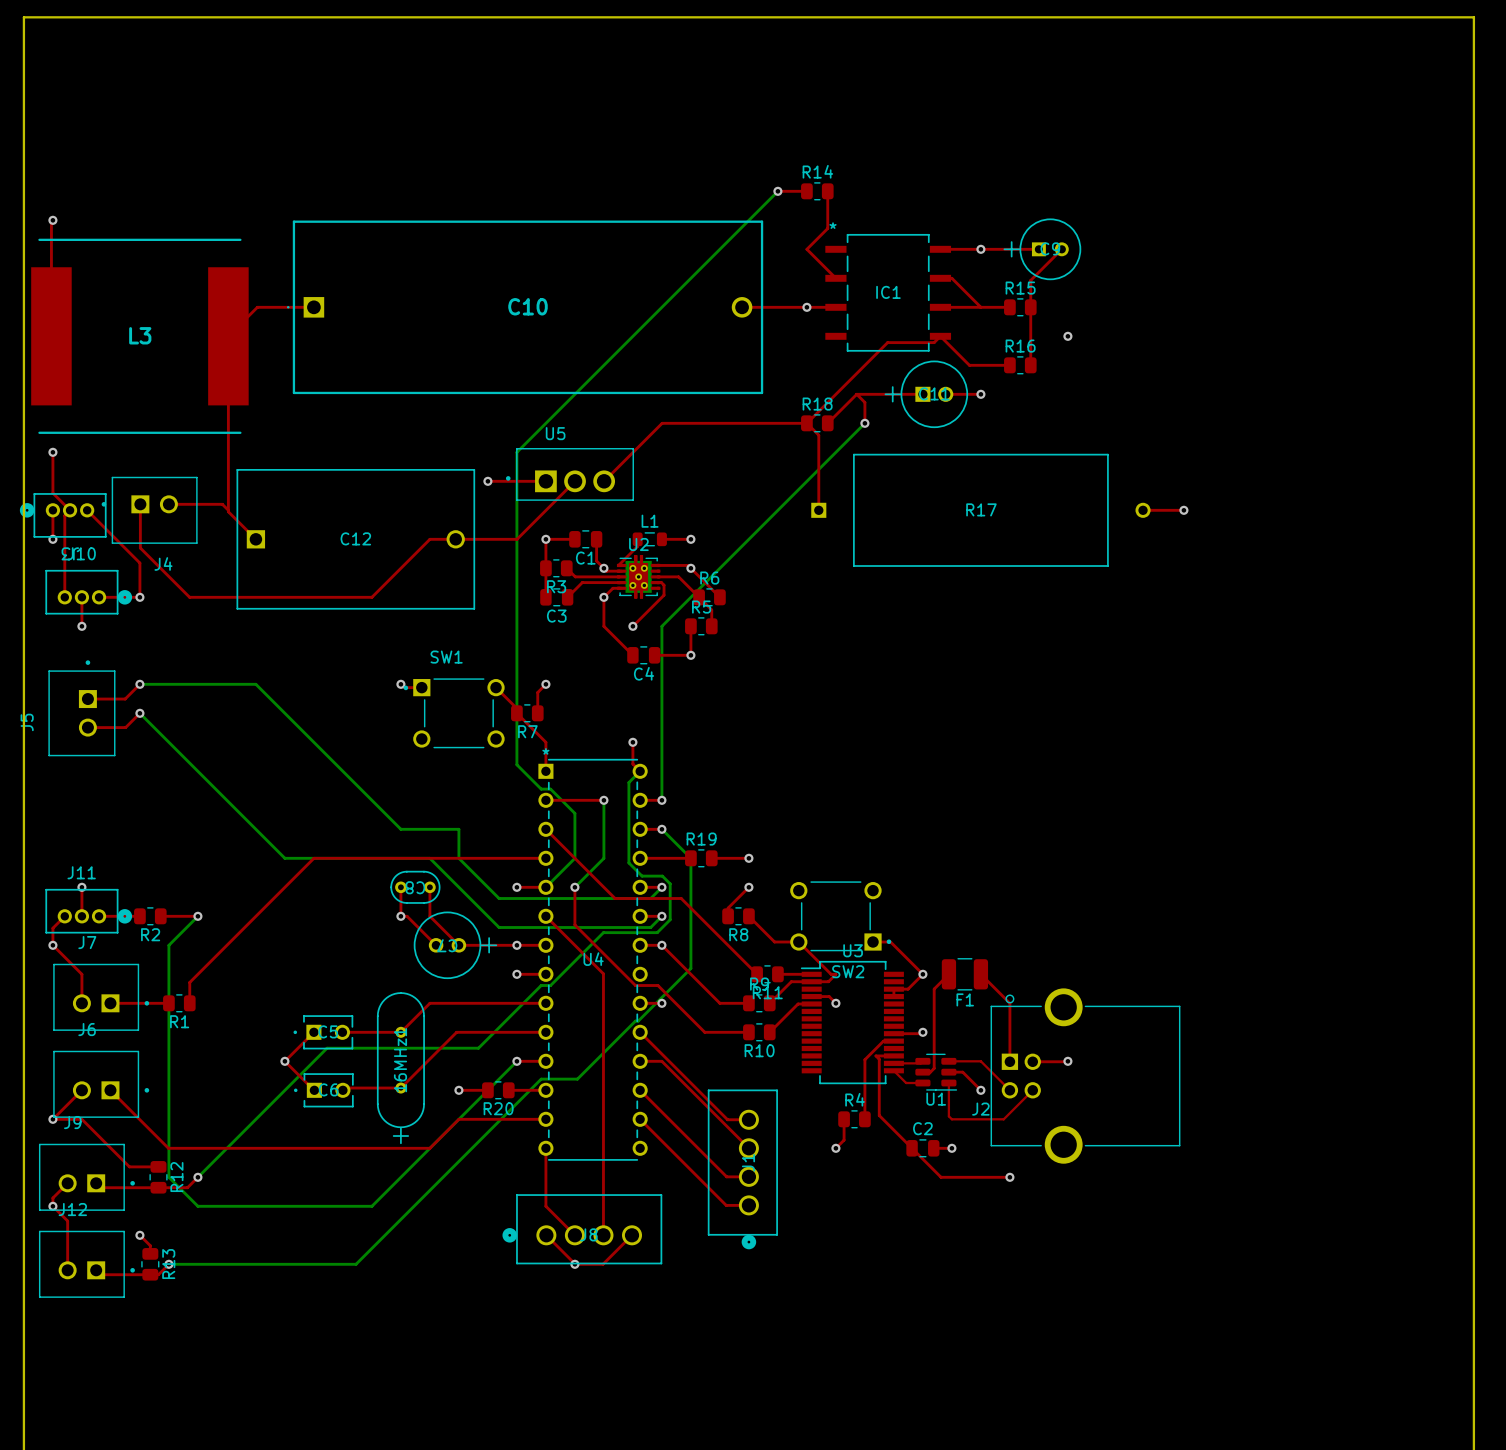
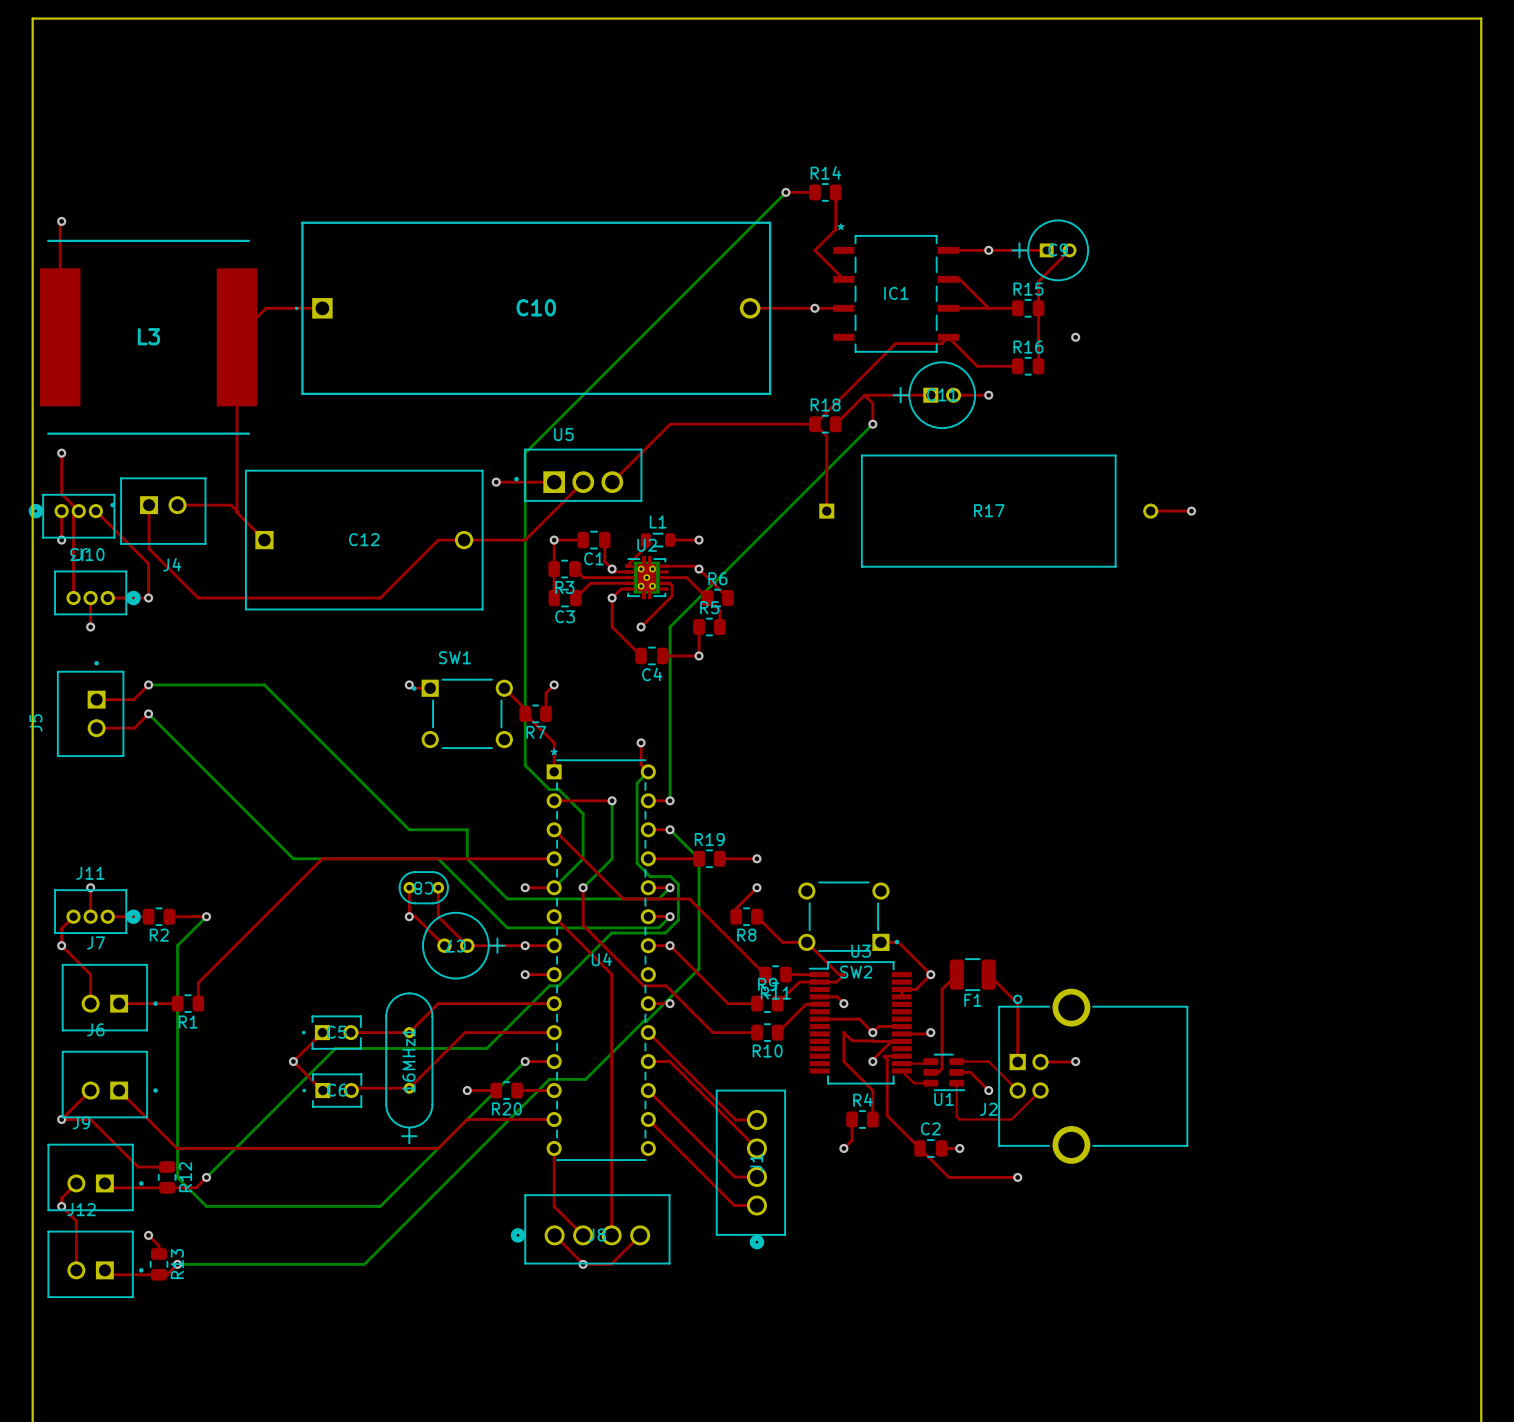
top track: none -> (819, 1019) (859, 1019) (872, 1032) (878, 1026) (901, 1026)
via: none -> (872, 1032)
top track: (864, 1061) (864, 1090) -> (891, 1041) (852, 1040) (843, 1032) (843, 1061) (872, 1090)
via: none -> (872, 1061)

